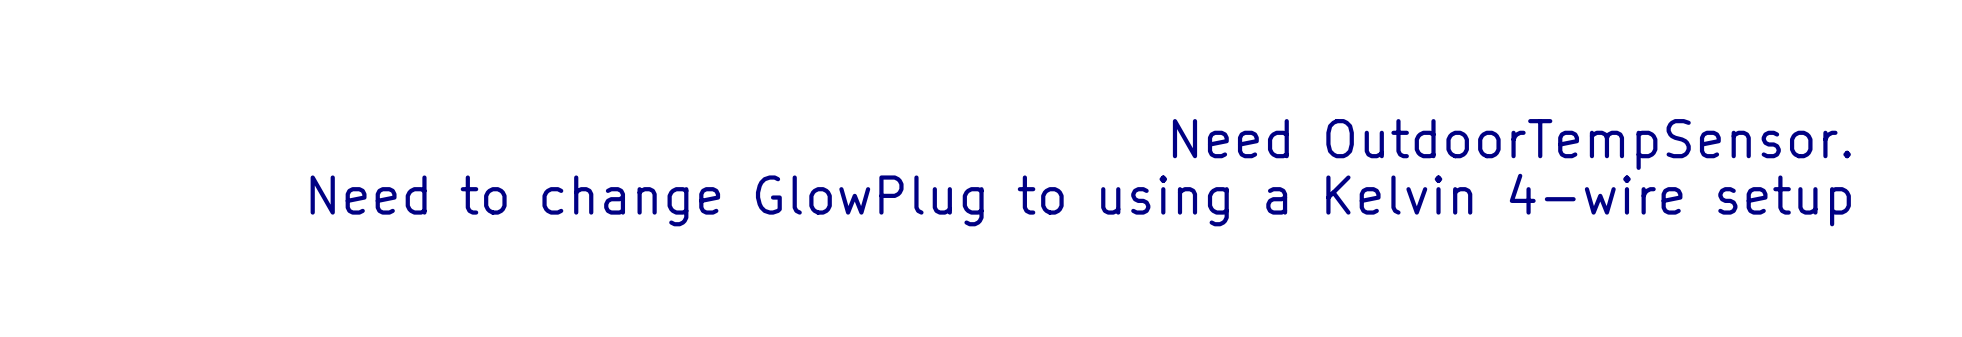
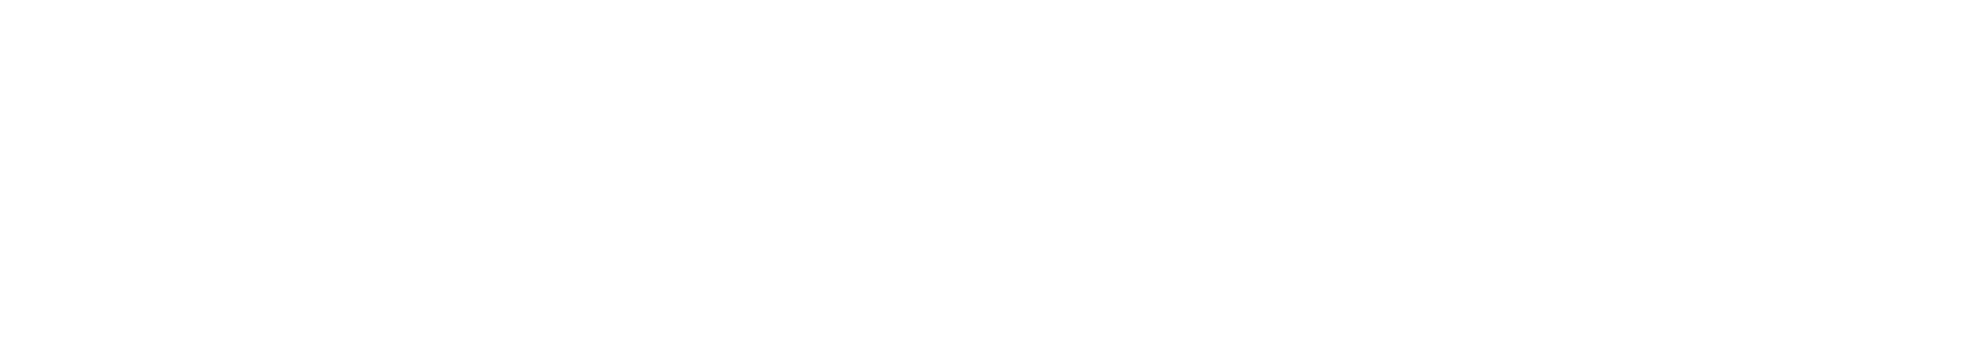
text: Need OutdoorTempSensor. (1511, 144) -> none
text: Need to change GlowPlug to using a Kelvin 4-wire setup (1080, 200) -> none

